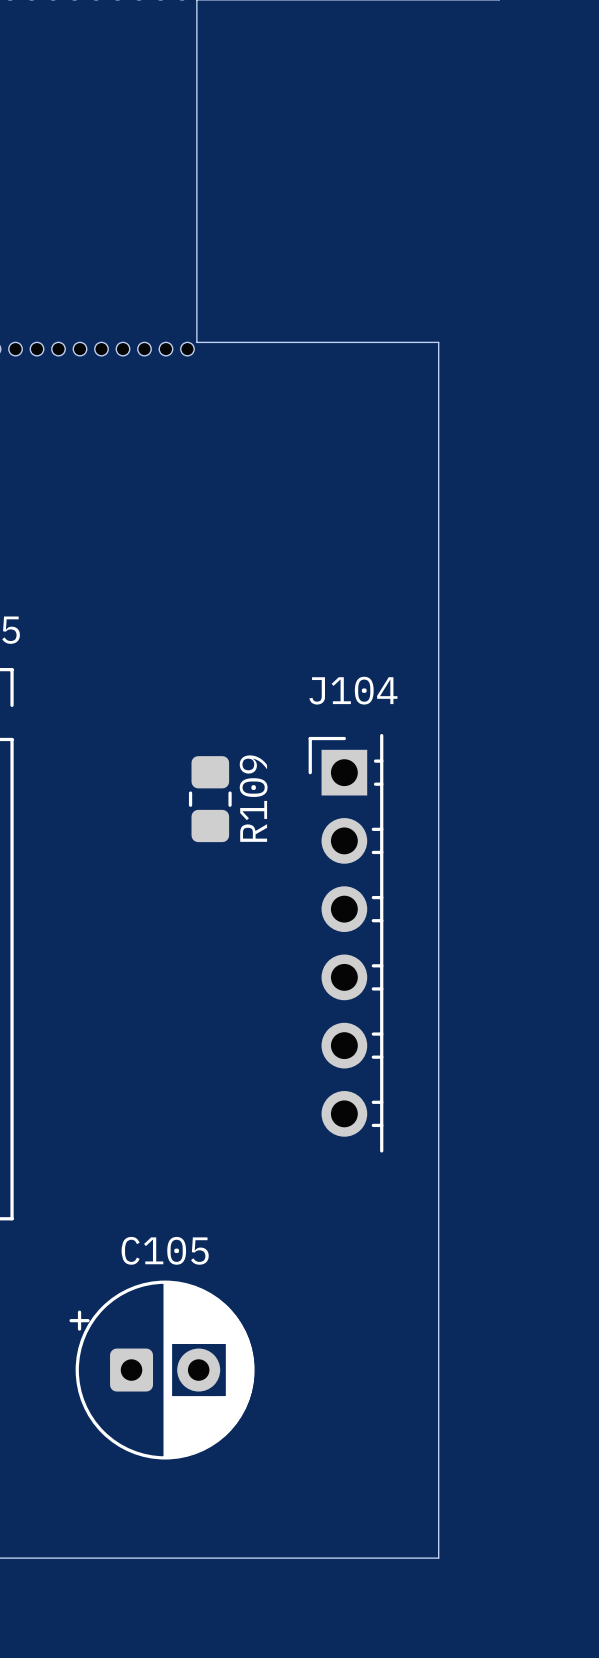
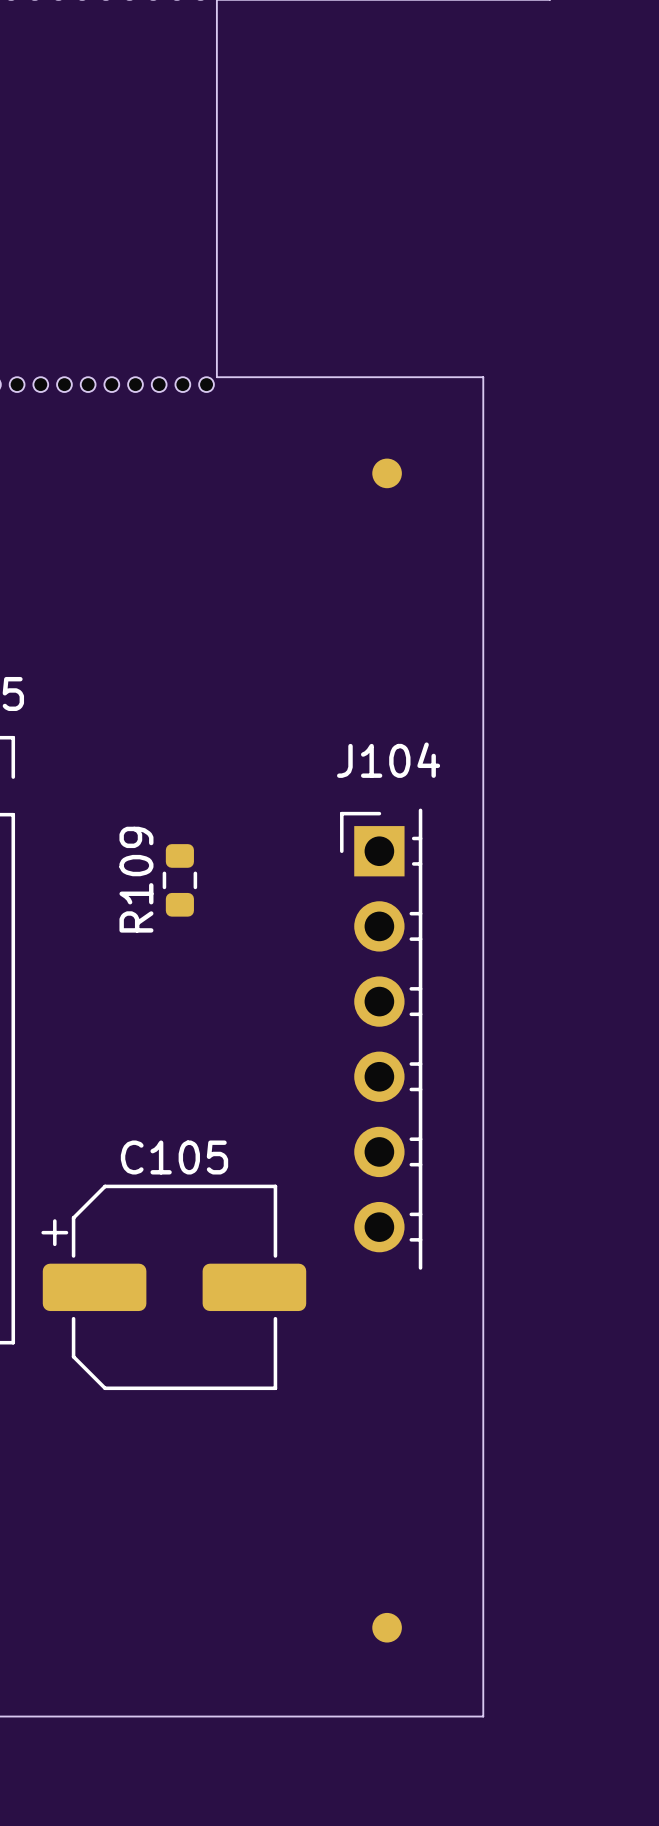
part: none -> (387, 473)
R109 footprint: [188, 756, 232, 843] -> [162, 844, 198, 917]
R109 name position: R109 (253, 798) -> R109 (136, 879)
C105 footprint: [69, 1280, 255, 1460] -> [41, 1184, 307, 1391]
part: none -> (387, 1627)

